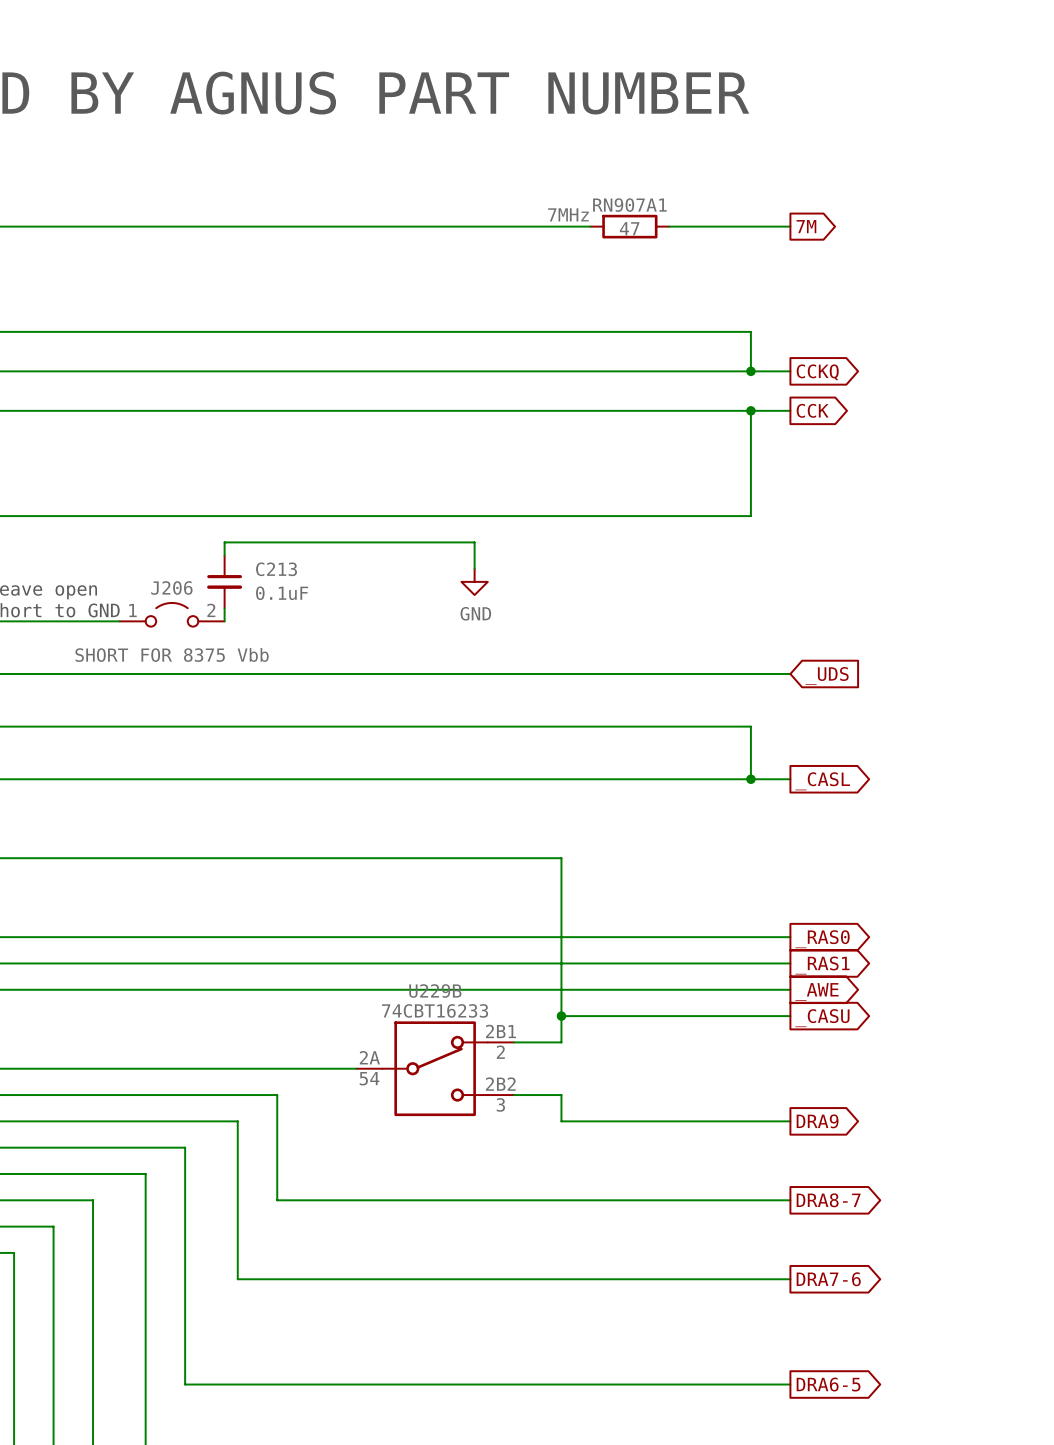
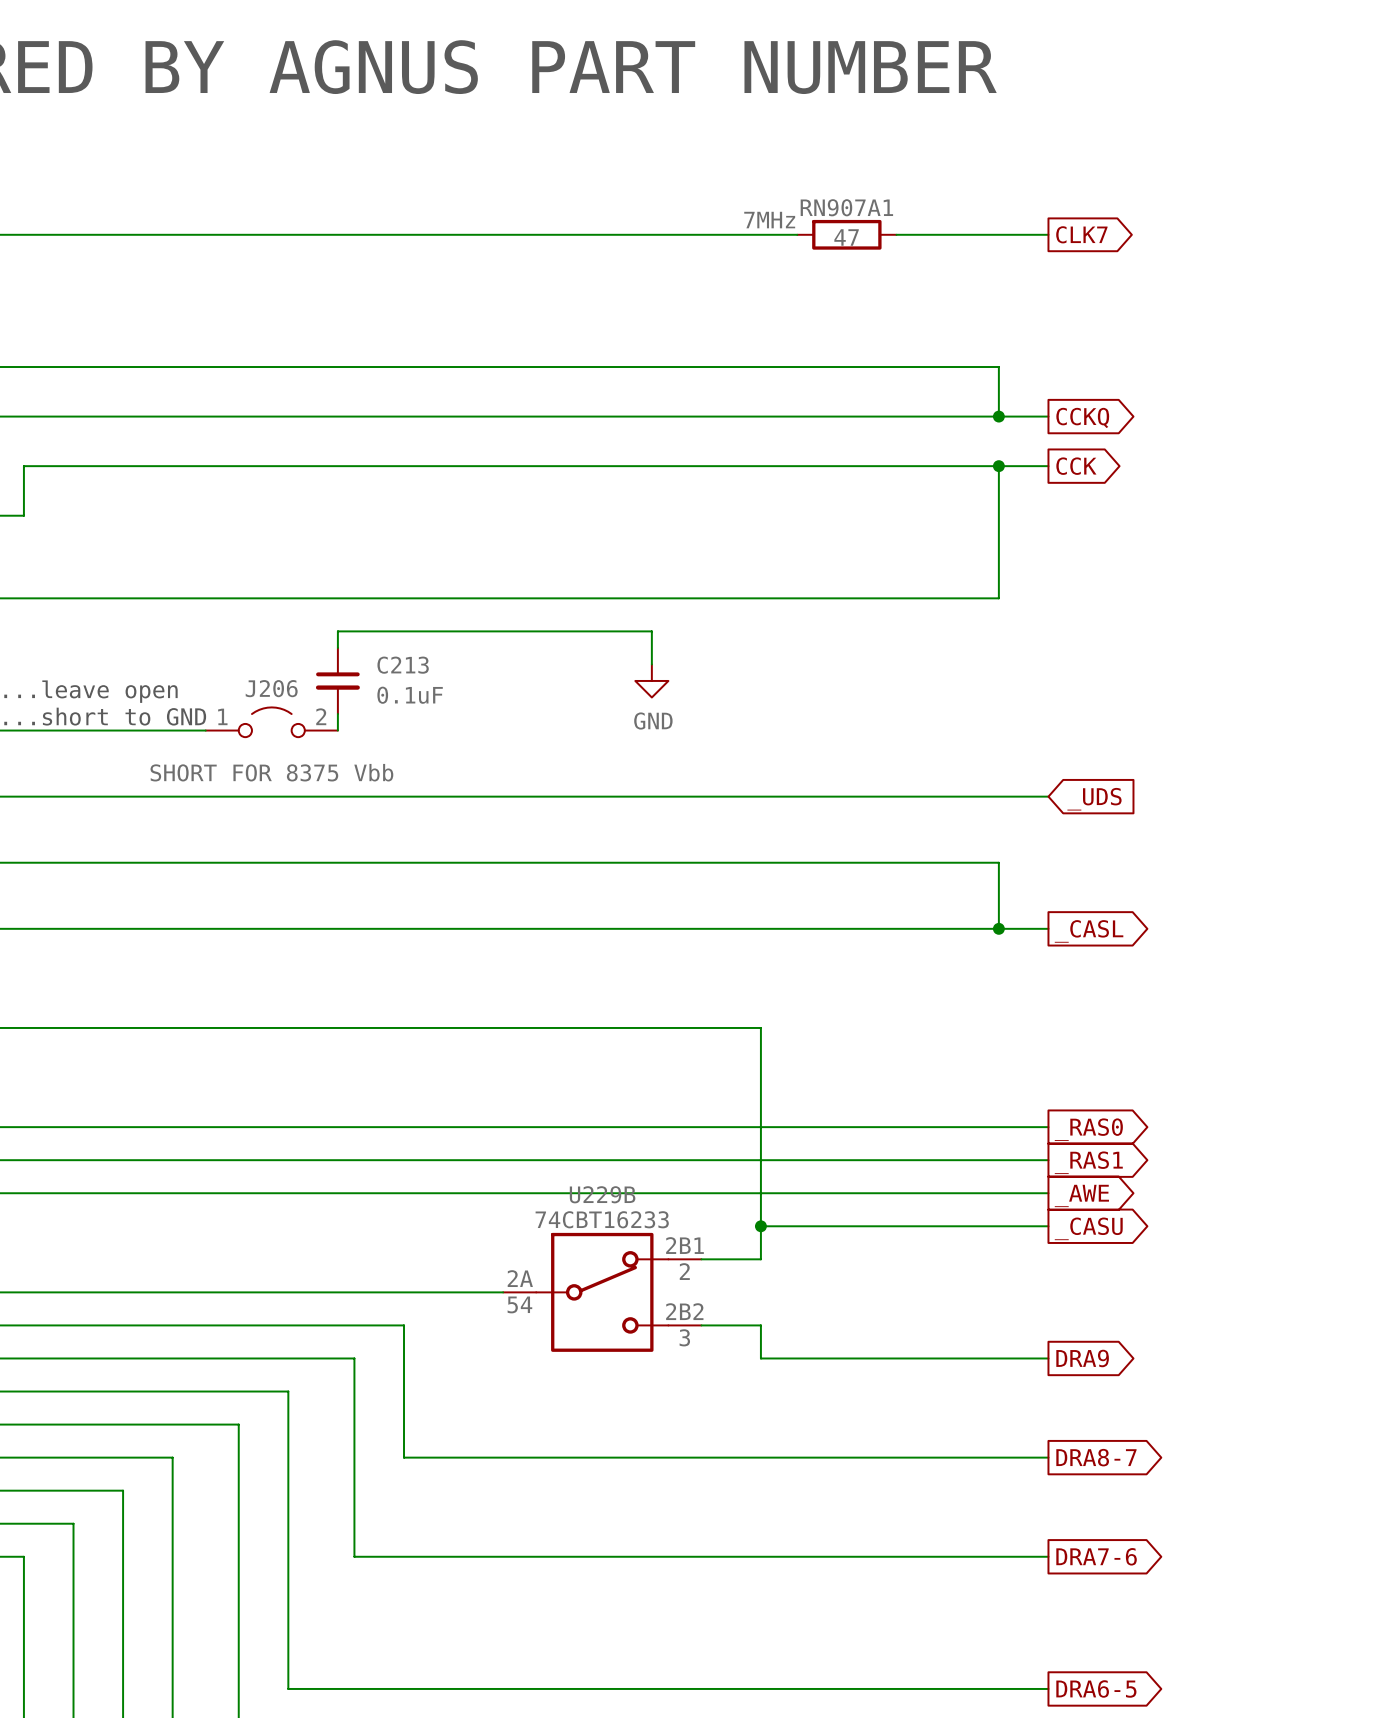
global label: 7M (806, 226) -> CLK7 (1081, 234)

